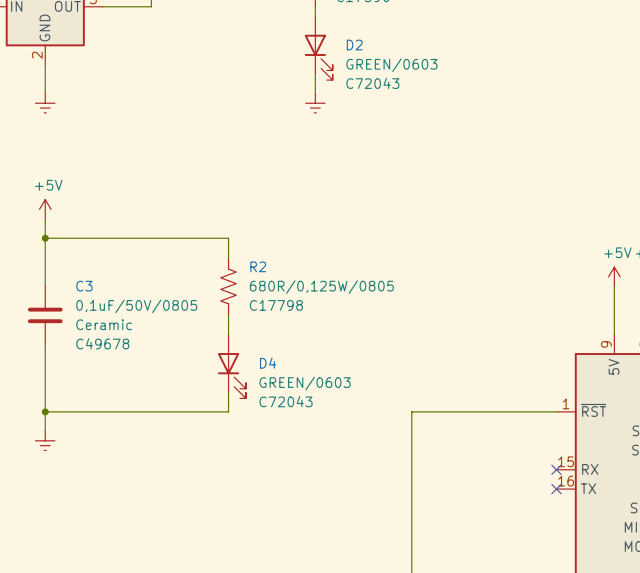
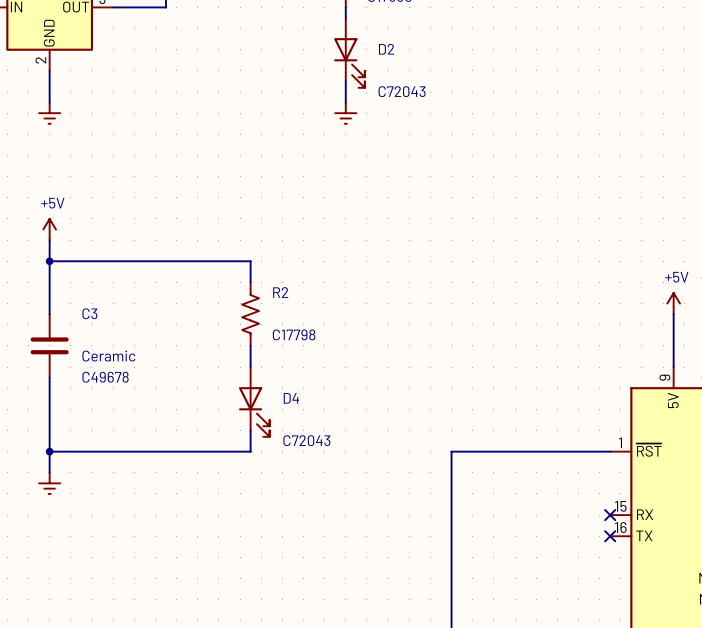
D2 value: GREEN/0603 (391, 65) -> none
R2 value: 680R/0,125W/0805 (321, 287) -> none
C3 value: 0,1uF/50V/0805 (136, 306) -> none
D4 value: GREEN/0603 (305, 383) -> none

